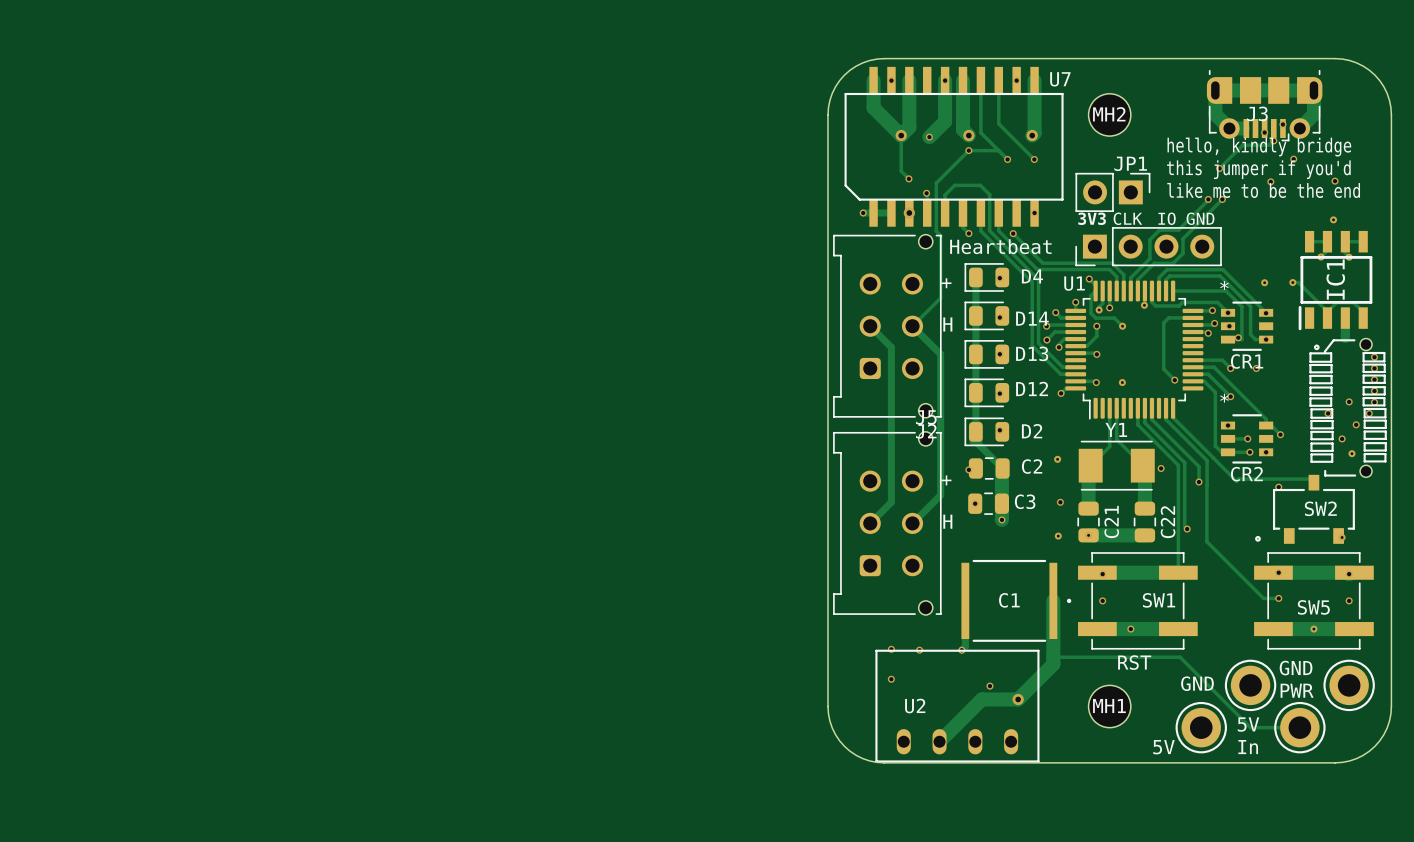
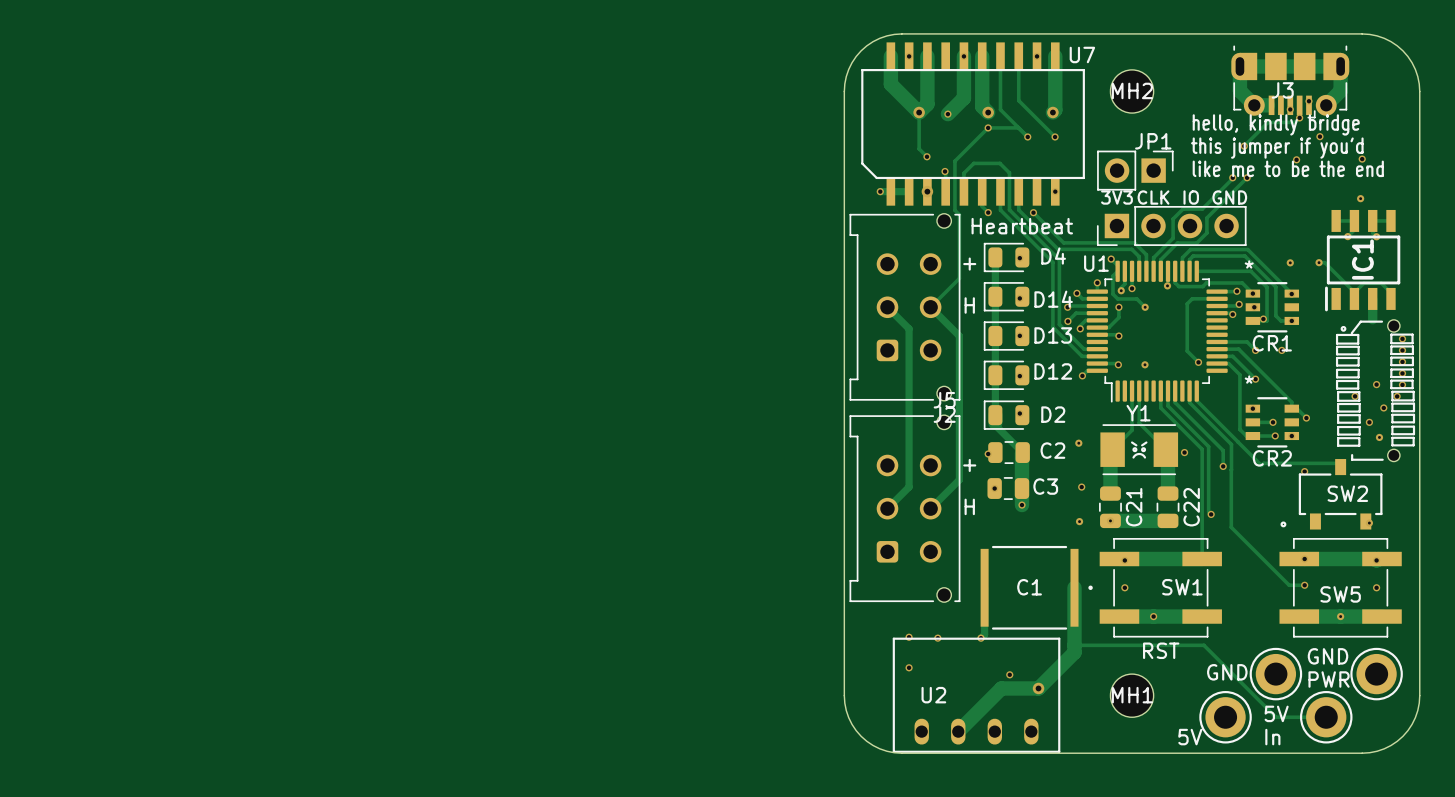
line: none -> (1132, 442) (1136, 445)
line: none -> (1146, 442) (1142, 445)
drawing: none -> [1132, 447, 1147, 453]
line: none -> (1133, 457) (1139, 453) (1144, 457)

